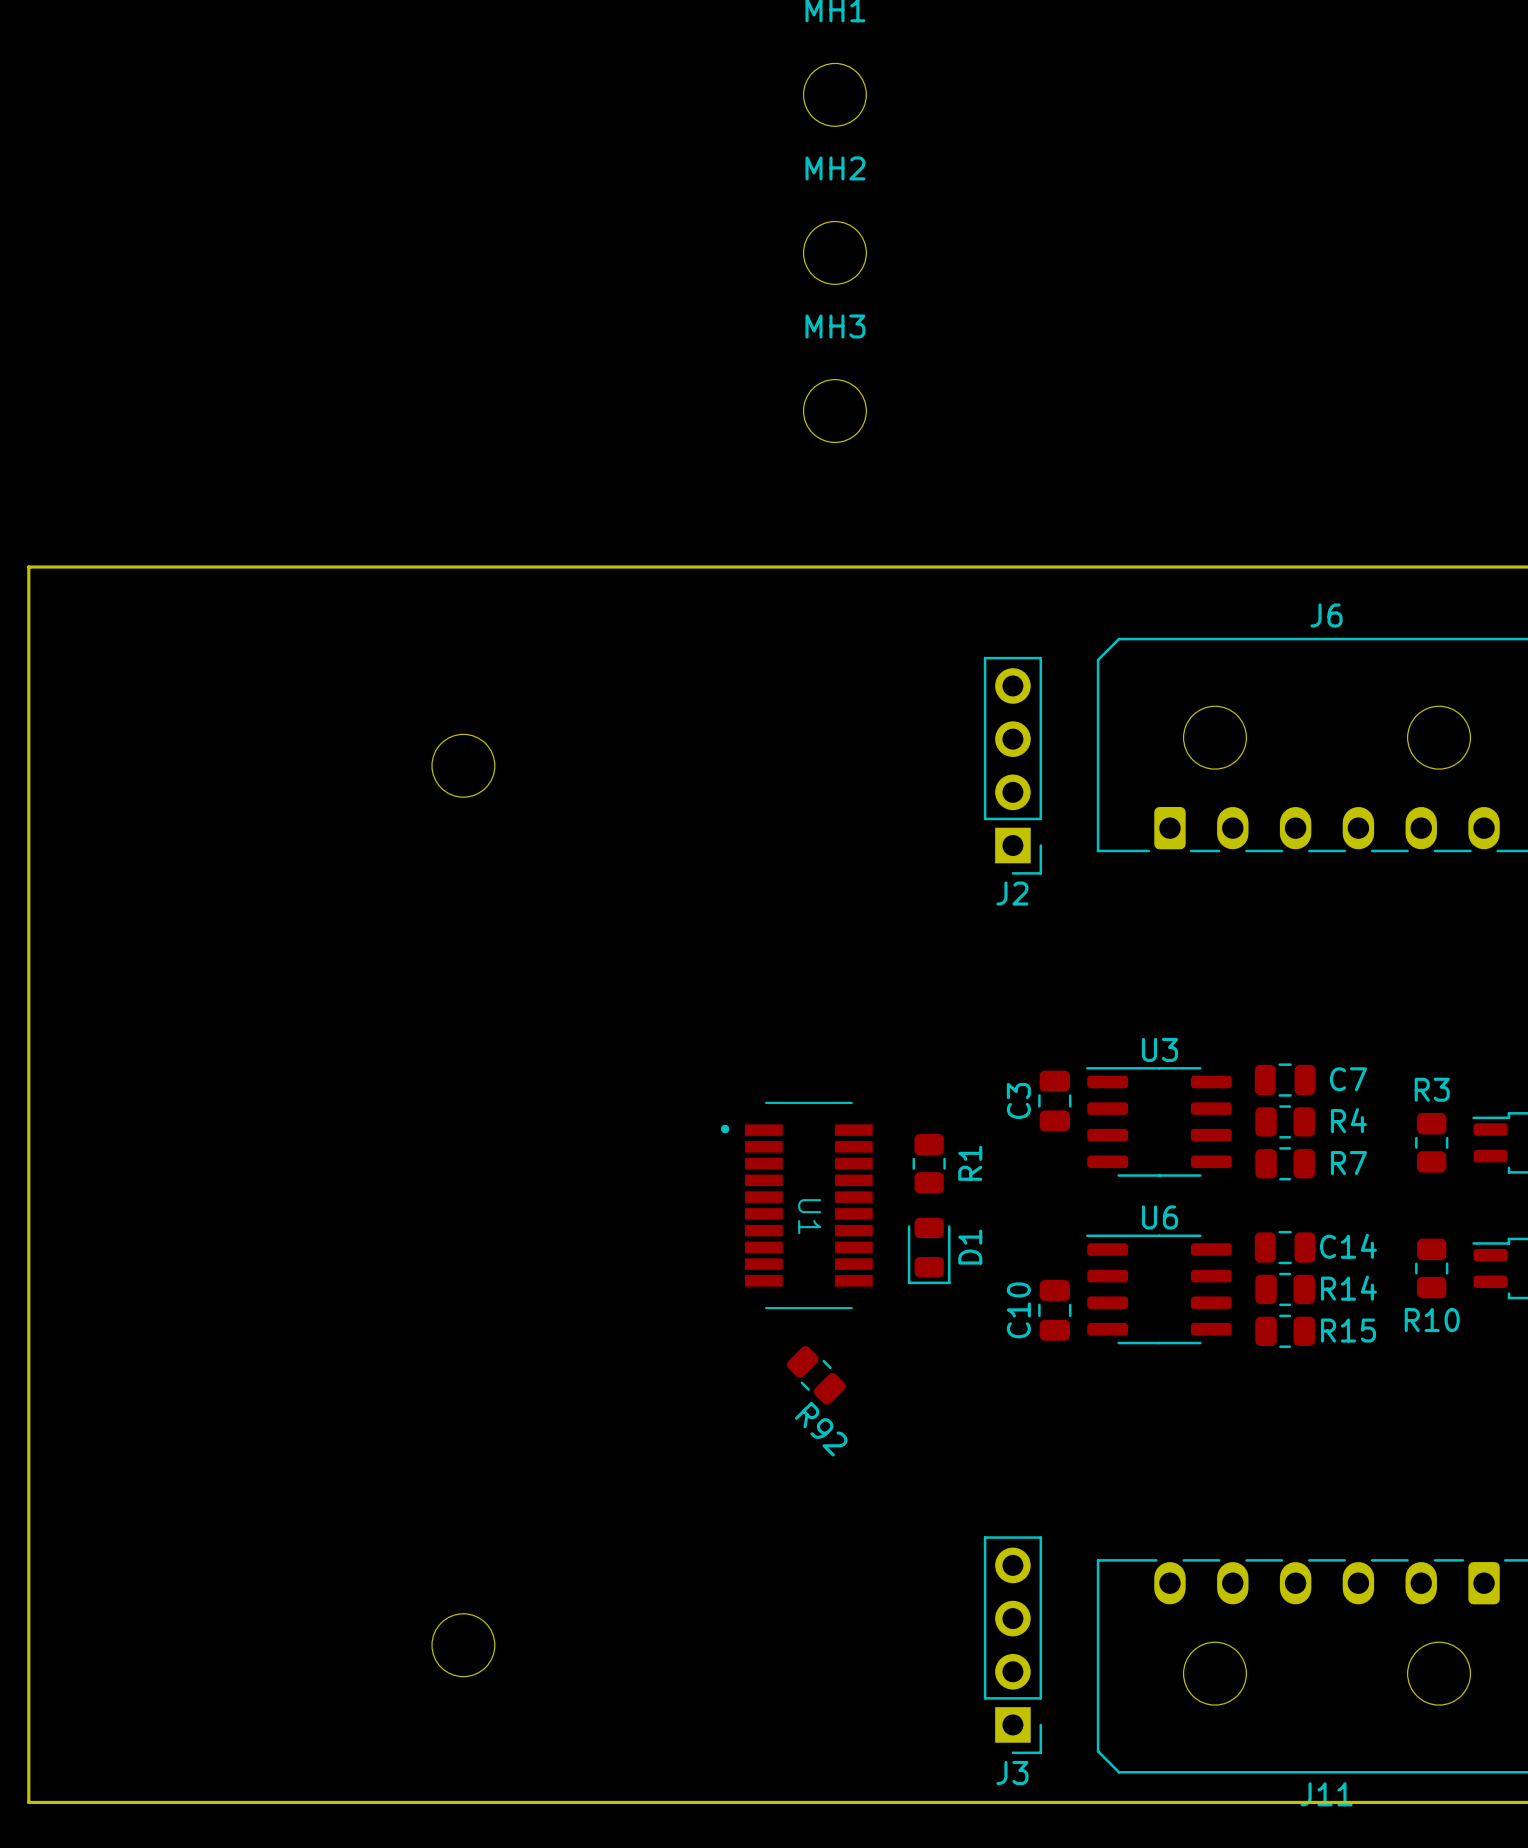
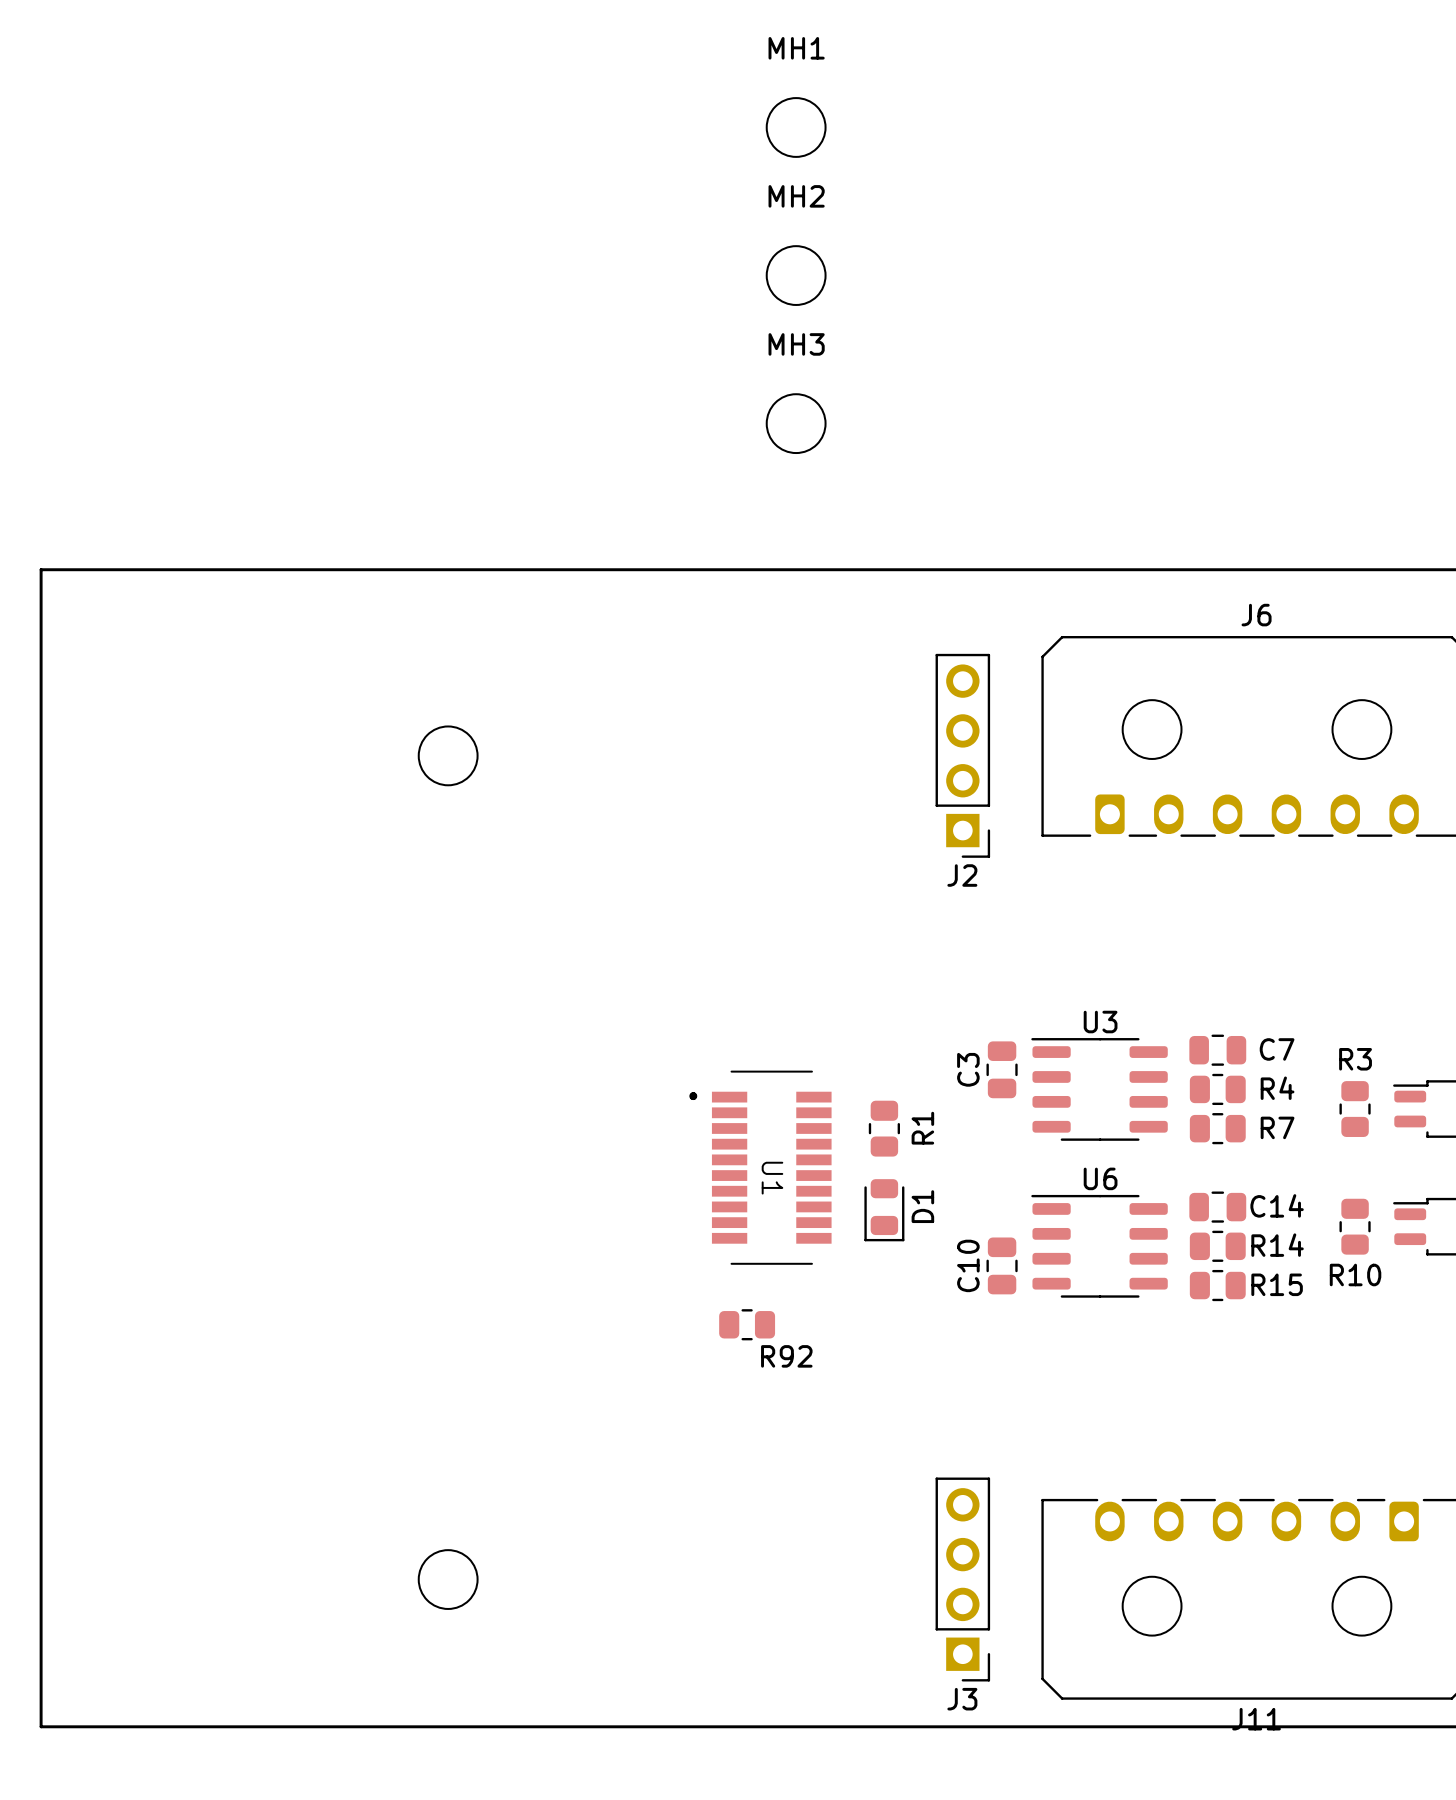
R92 rotation: 0° (816, 1375) -> 45° counterclockwise (747, 1324)

